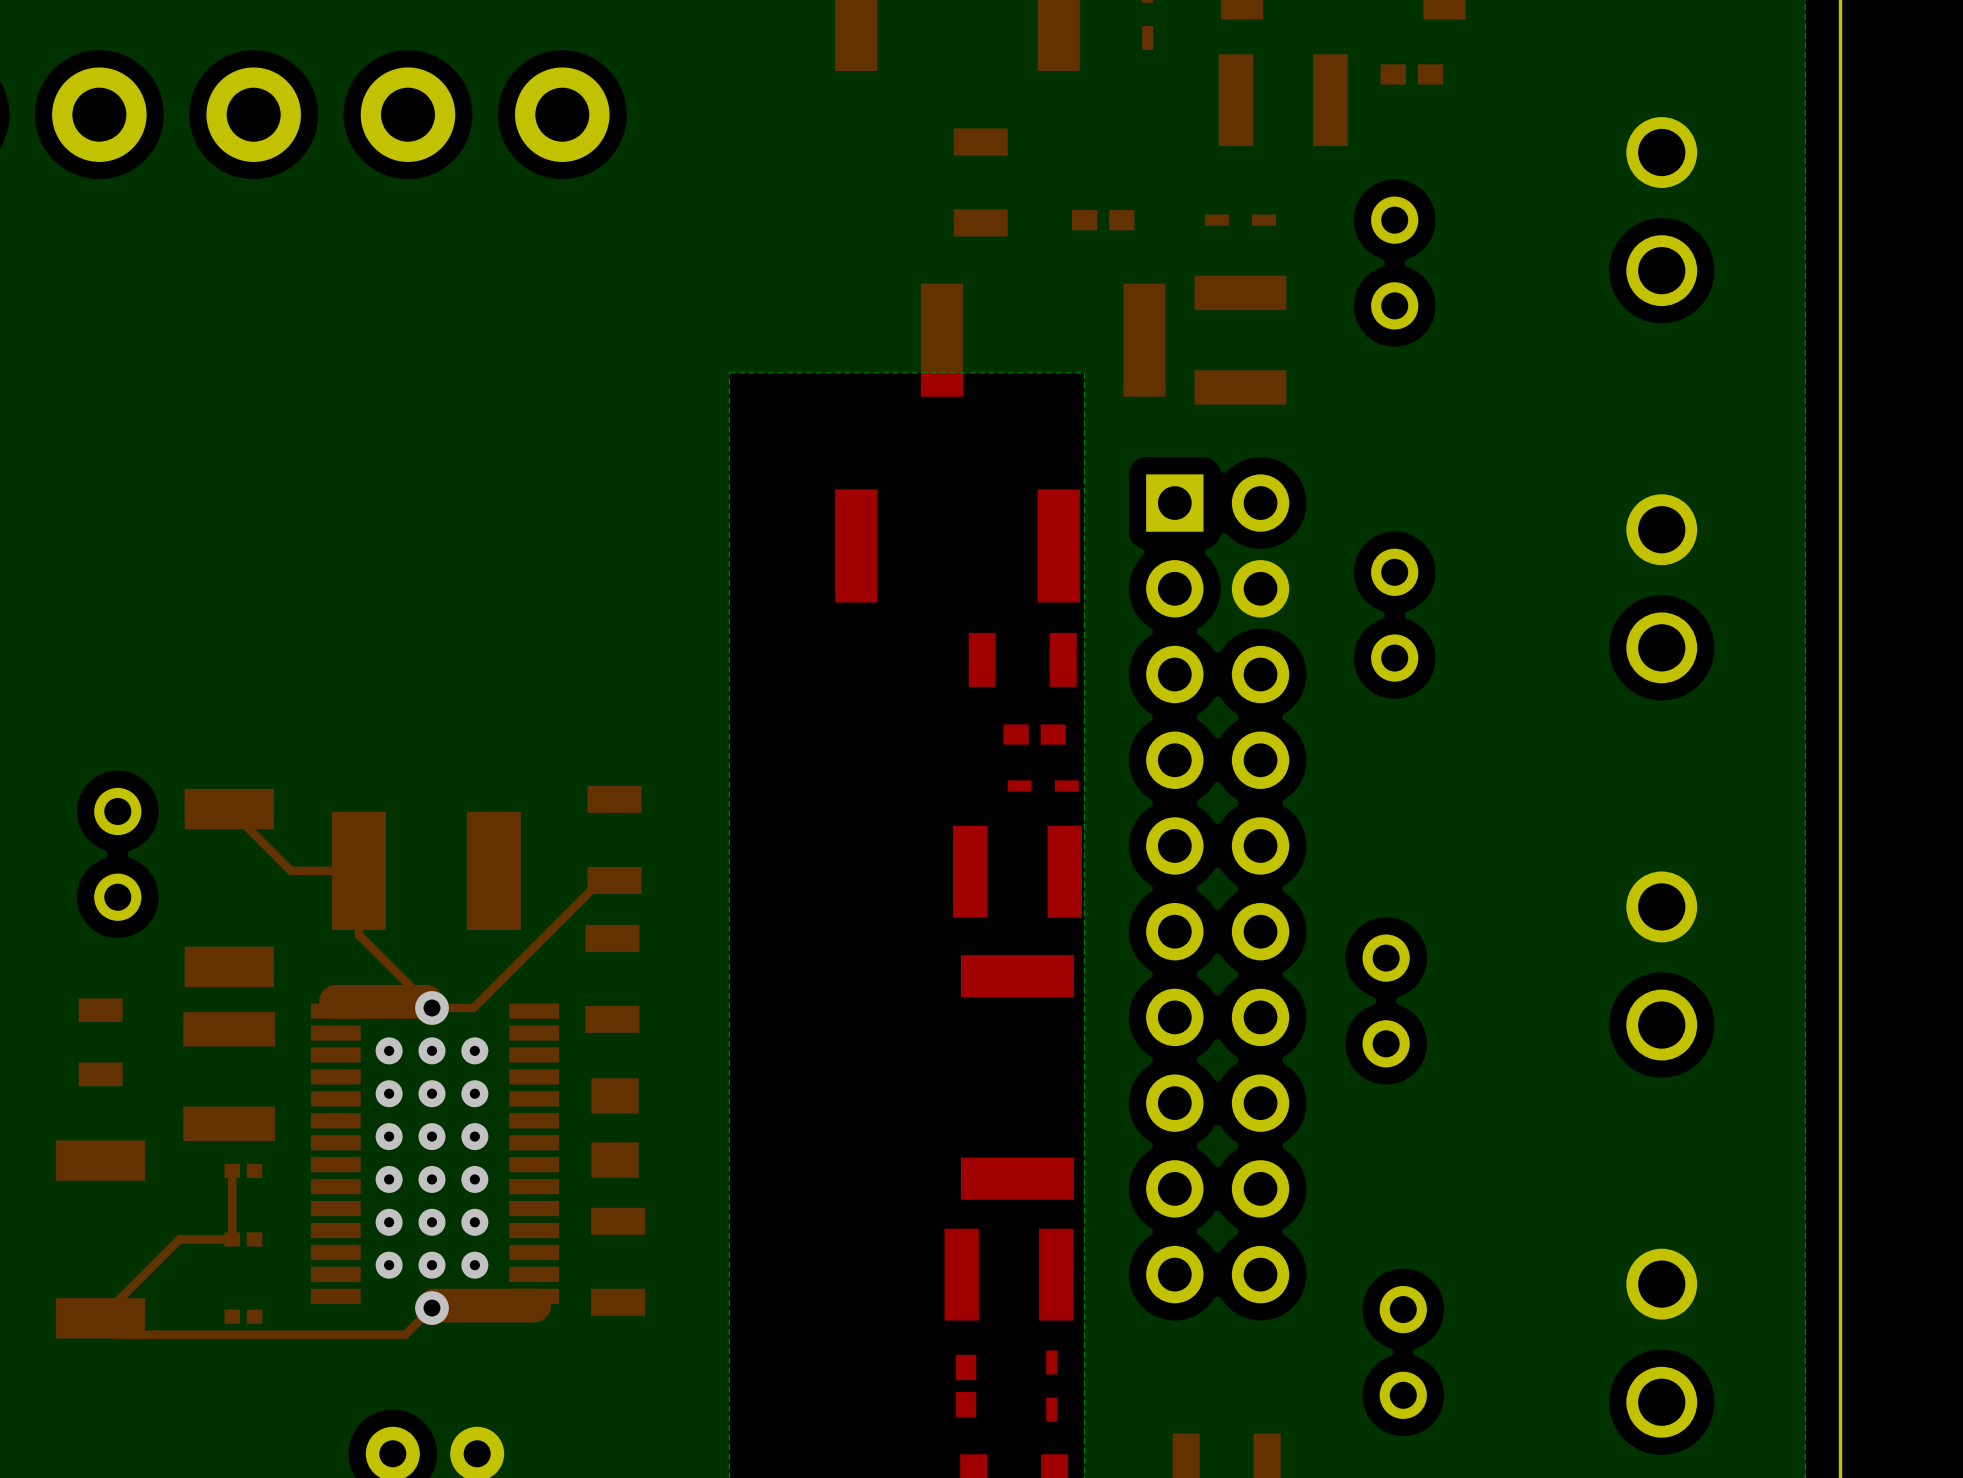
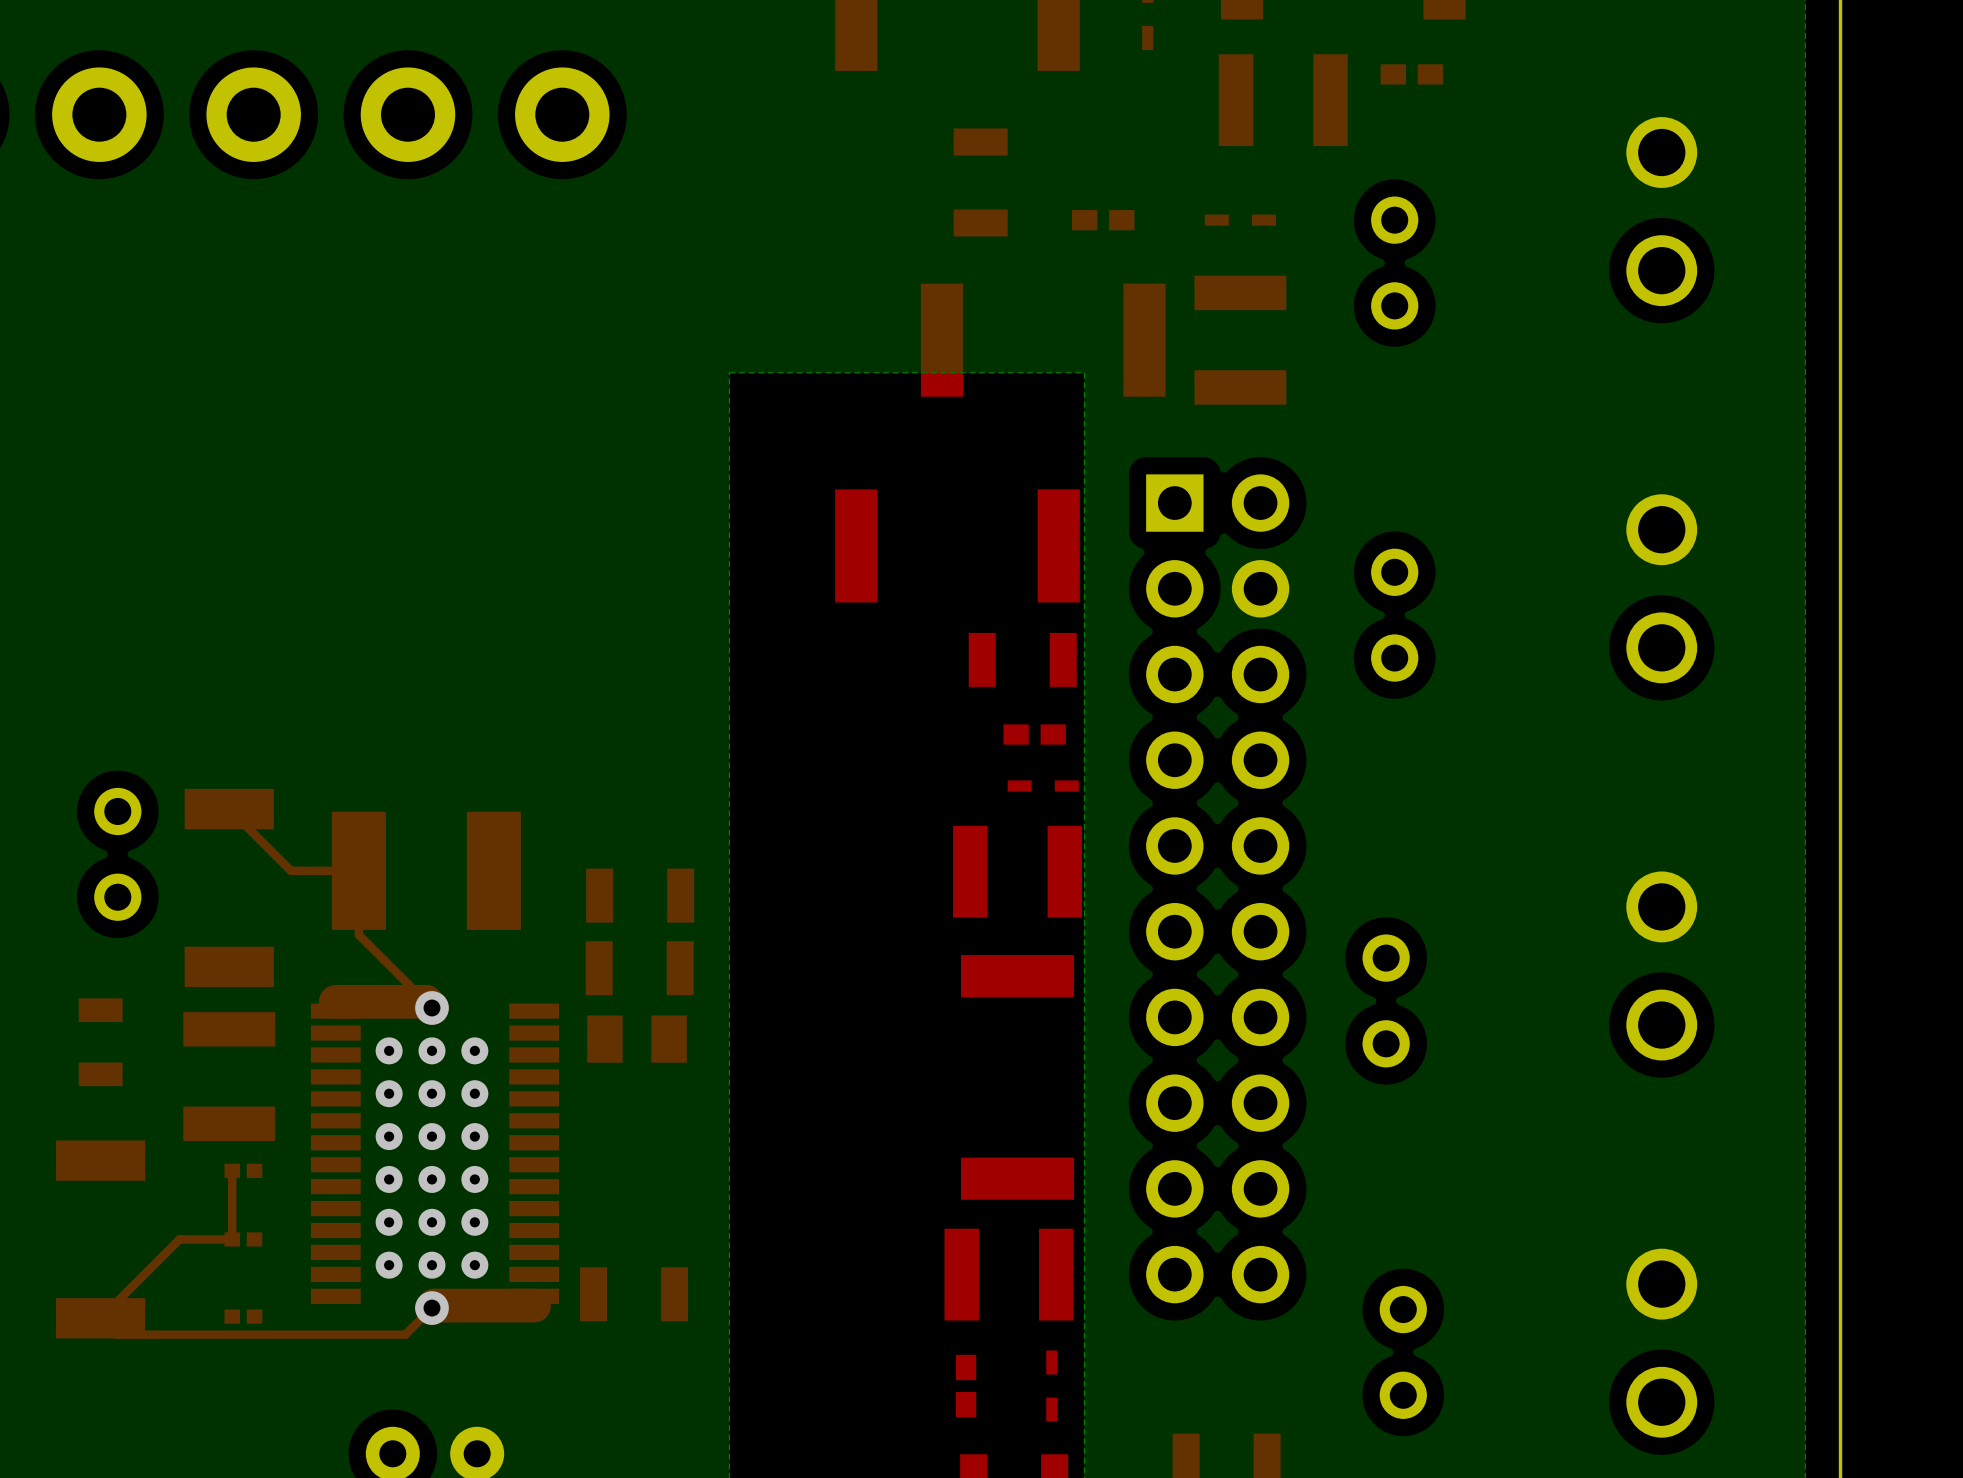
part rotation: 0° (614, 839) -> 90° clockwise (640, 895)
top track: (614, 880) (601, 880) (473, 1007) (431, 1007) -> none
part rotation: 0° (612, 978) -> 90° clockwise (639, 968)
part rotation: 0° (615, 1128) -> 90° clockwise (637, 1039)
part position: (615, 1128) -> (637, 1039)
part rotation: 0° (618, 1261) -> 90° clockwise (634, 1294)

